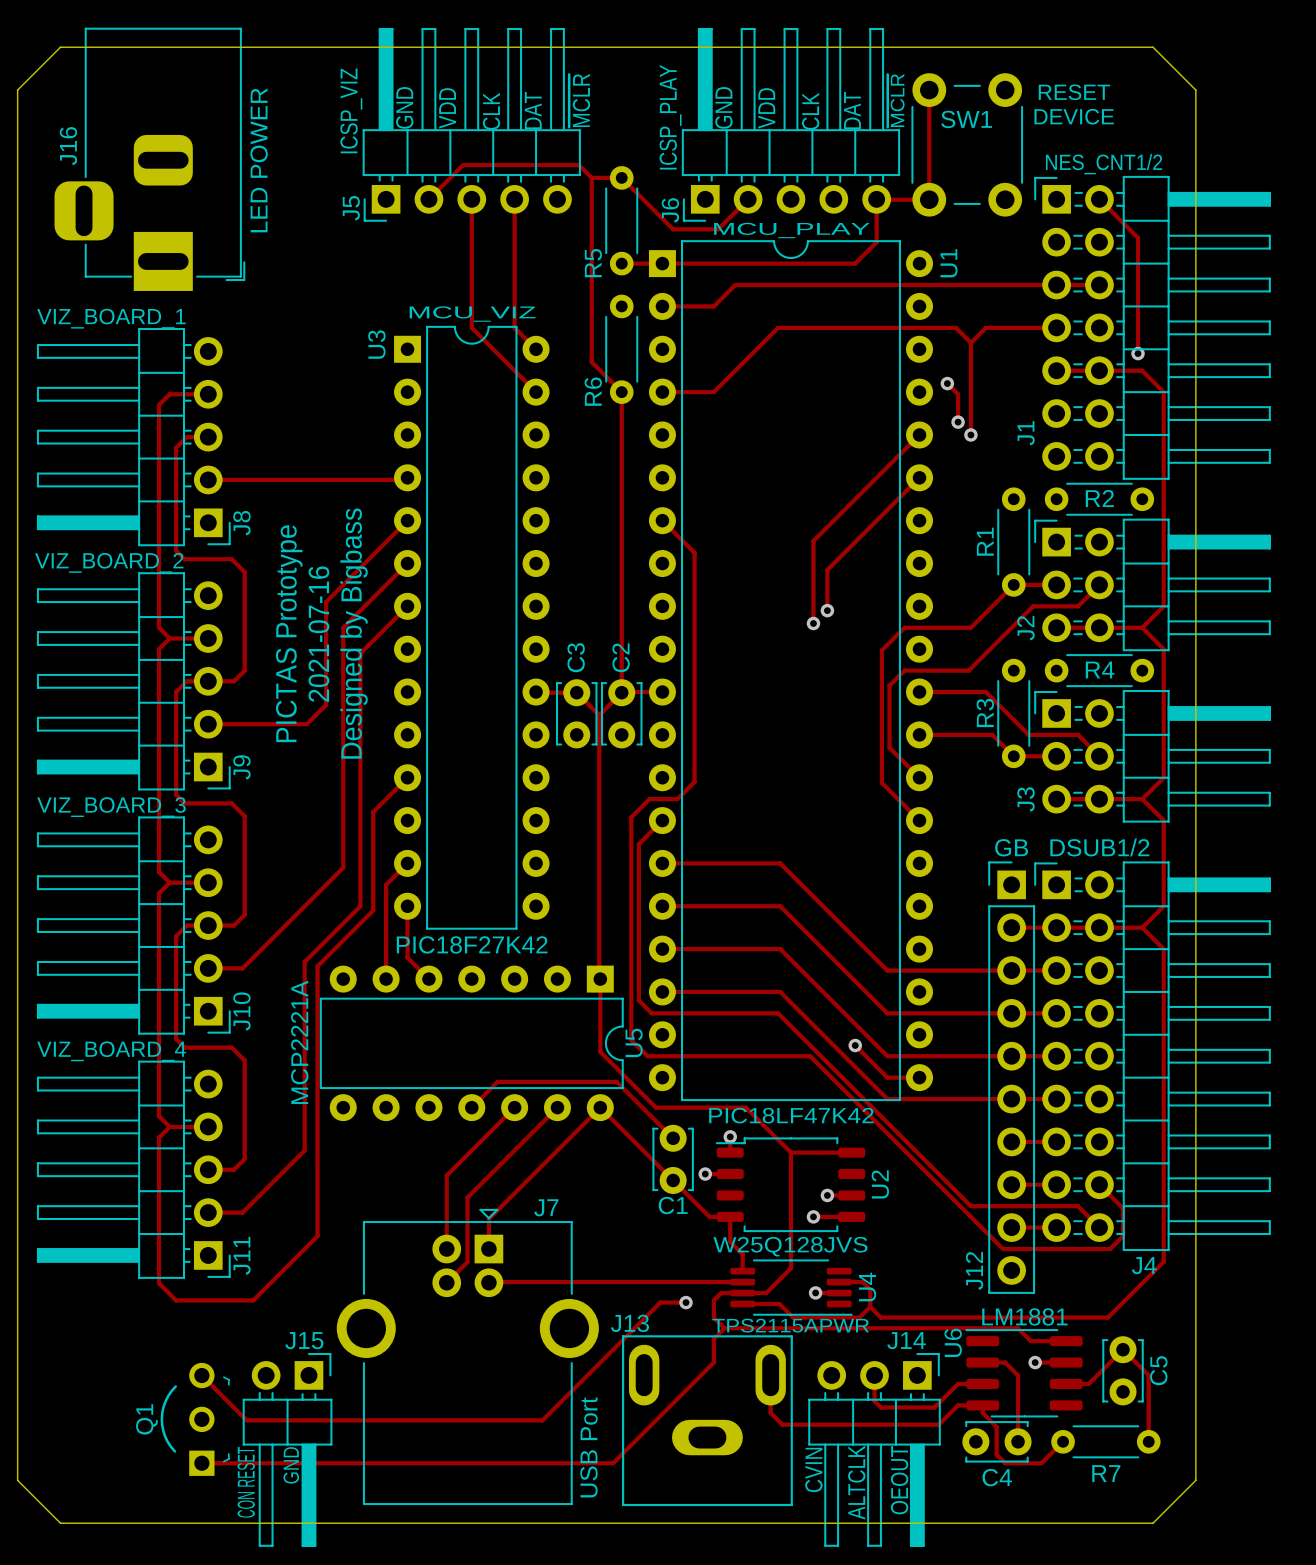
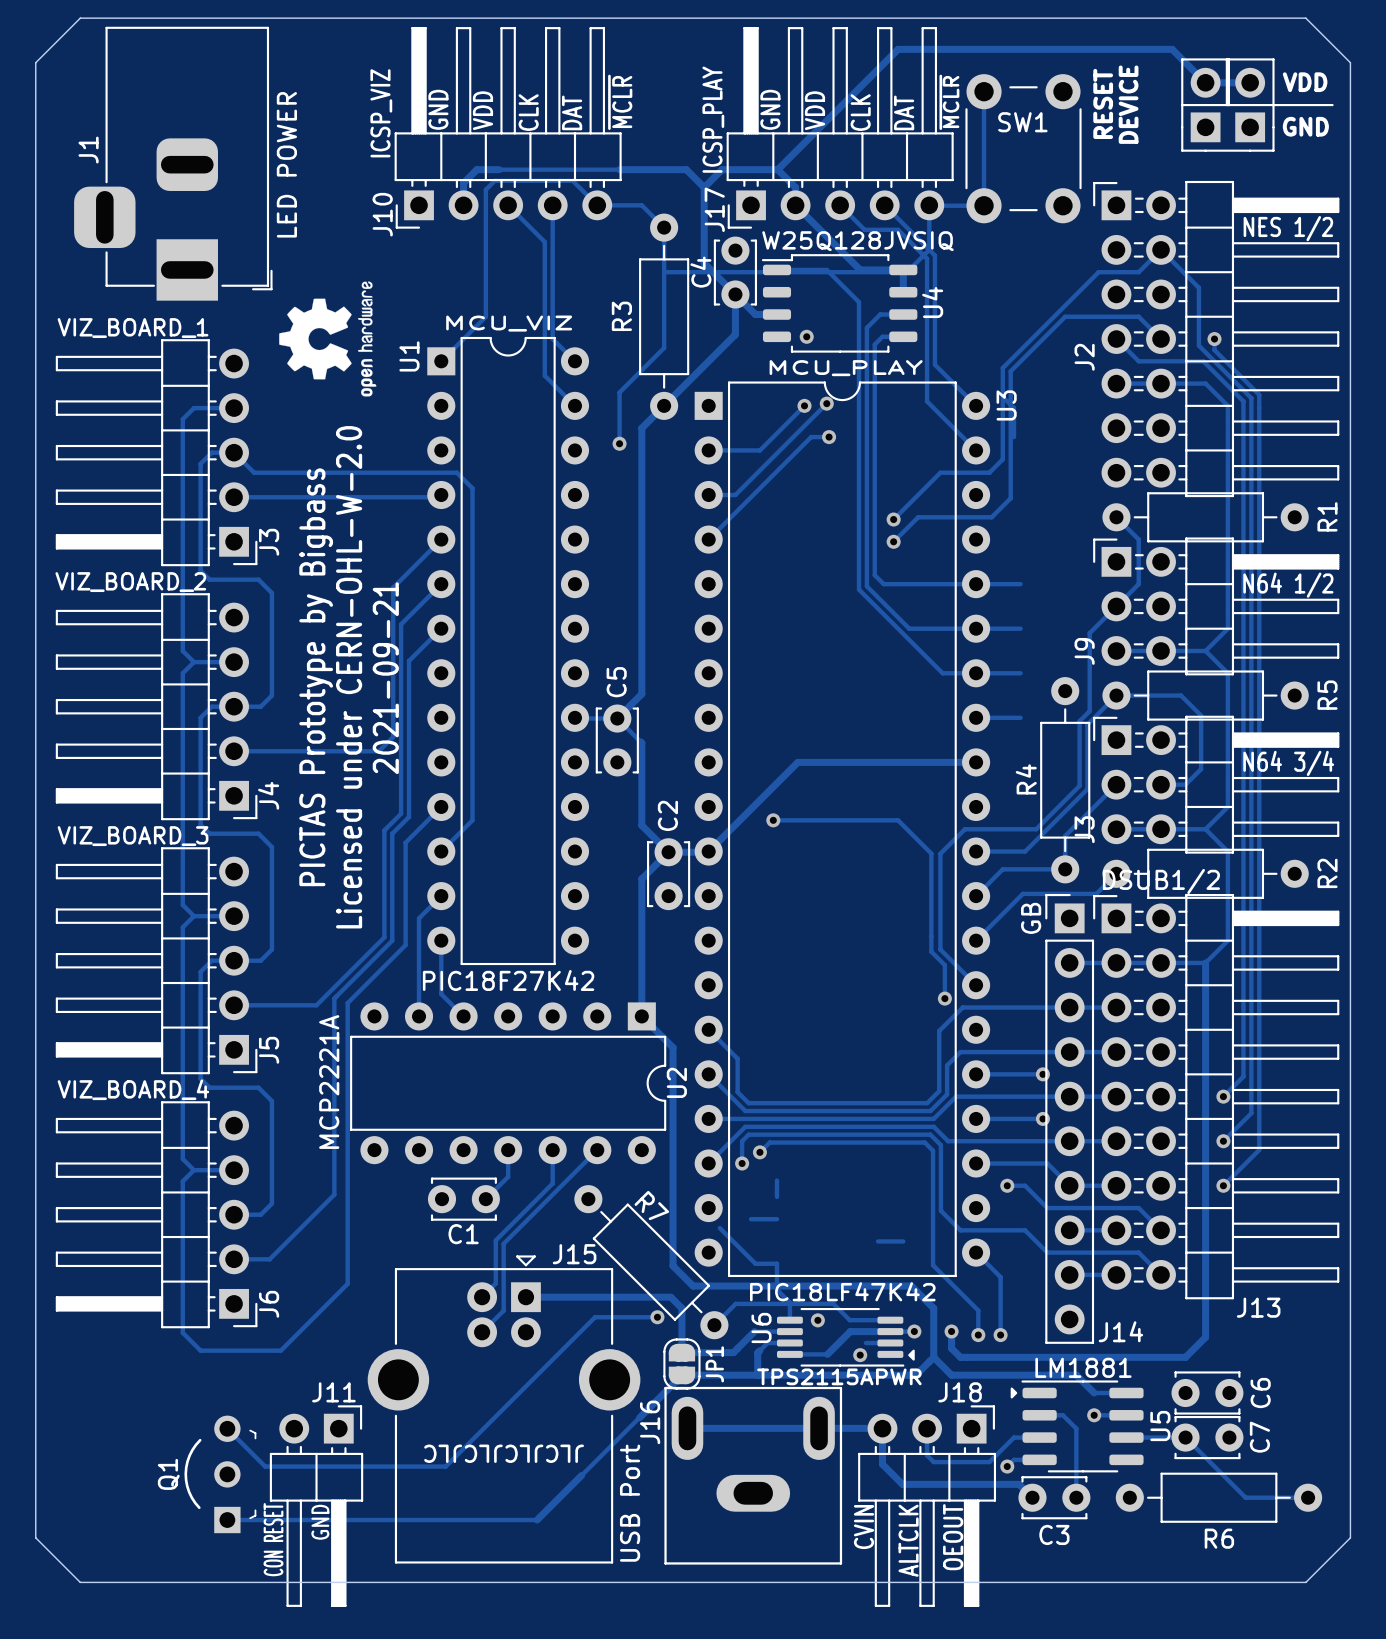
text: none -> VDD (1305, 82)
track: none -> (1250, 82) (1205, 82) (1172, 49) (898, 49) (777, 169)
board edge: (17, 90) (60, 47) (1153, 47) (1195, 90) (1195, 1480) (1153, 1523) -> (35, 91) (35, 62) (80, 18) (1305, 18) (1350, 62) (1350, 1537) (1305, 1582) (1216, 1582)
text rotation: 0° (1074, 92) -> 90° counterclockwise (1103, 103)
line: none -> (1182, 105) (1182, 127)
part: none -> (1205, 105)
part: none -> (1250, 105)
line: none -> (1332, 105) (1273, 105) (1273, 127)
text rotation: 0° (1074, 116) -> 90° counterclockwise (1128, 104)
text: none -> GND (1305, 126)
J16 name: J16 (68, 146) -> J1 (88, 150)
line: none -> (1205, 150) (1250, 150)
J1 value: NES_CNT1/2 (1104, 164) -> NES 1/2 (1288, 228)
track: (463, 165) (428, 199) -> (499, 169) (476, 169) (463, 183) (463, 205)
track: (578, 165) (591, 177) -> (619, 169) (686, 169) (704, 187)
track: none -> (777, 169) (795, 187) (795, 205) (860, 269) (903, 269) (903, 292)
track: none -> (777, 169) (722, 169) (704, 187)
R5 footprint: [605, 166, 639, 276] -> [1102, 670, 1309, 721]
track: (591, 177) (591, 362) (621, 392) (621, 692) -> none
track: (591, 177) (621, 177) (673, 229) (718, 229) (748, 199) -> none
track: none -> (704, 187) (704, 263) (755, 314) (776, 314)
track: (471, 199) (471, 327) (507, 363) -> (508, 205) (544, 242) (544, 375)
track: none -> (840, 205) (864, 229) (898, 229) (927, 258) (927, 401) (976, 450)
track: none -> (884, 205) (934, 255) (934, 364) (976, 405)
track: (1099, 199) (1138, 237) (1138, 353) -> none
J5 name: J5 (351, 208) -> J10 (382, 214)
J6 name: J6 (670, 210) -> J17 (714, 209)
text position: MCU_PLAY (791, 230) -> MCU_PLAY (846, 368)
track: none -> (776, 269) (826, 269) (859, 302) (859, 589) (942, 673) (1020, 673)
R5 name position: R5 (593, 263) -> R5 (1327, 695)
C4: none -> (735, 272)
drawing: none -> [279, 281, 377, 397]
track: none -> (735, 294) (735, 334) (641, 428) (641, 694) (617, 718)
track: (1099, 285) (735, 285) (713, 306) (662, 306) -> none
U4: none -> W25Q128JVSIQ (839, 303)
R6 footprint: [605, 294, 639, 404] -> [1115, 1472, 1323, 1523]
track: none -> (903, 314) (880, 314) (866, 327) (866, 586) (909, 628) (1020, 628)
via: none -> (806, 336)
track: none -> (903, 336) (882, 336) (874, 344) (874, 575) (883, 584) (1020, 584)
track: (985, 327) (1056, 327) -> (1042, 339) (1065, 316) (1138, 316) (1161, 339)
track: none -> (1116, 339) (1138, 361) (1203, 361) (1243, 401) (1243, 1076) (1223, 1096)
track: none -> (1214, 339) (1214, 350) (1259, 394) (1259, 1149) (1223, 1185)
track: none -> (1027, 354) (1010, 371) (1010, 498) (991, 517) (918, 517) (893, 541)
U3 name: U3 (376, 344) -> U1 (409, 356)
track: none -> (441, 361) (485, 316) (485, 189) (494, 180) (572, 180) (597, 205) (641, 205) (664, 227) (664, 347) (619, 392) (619, 443)
via position: (1138, 353) -> (1214, 339)
via: (947, 383) -> none
track: none -> (826, 403) (735, 495) (708, 495)
via: none -> (826, 403)
track: (662, 392) (713, 392) (778, 327) (955, 327) (970, 342) (970, 434) -> none
track: none -> (804, 405) (759, 450) (708, 450)
via: none -> (804, 405)
track: none -> (829, 437) (811, 437) (708, 539)
via: none -> (829, 437)
via: (958, 422) -> none
via: none -> (619, 443)
J1 name: J1 (1026, 433) -> J2 (1084, 357)
track: (919, 434) (813, 541) (813, 623) -> none
via: (970, 434) -> none
track: none -> (234, 452) (254, 472) (456, 472) (472, 488) (472, 820) (441, 851)
track: (919, 477) (827, 569) (827, 610) -> none
R2 footprint: [1044, 482, 1155, 516] -> [1102, 848, 1309, 899]
R1 footprint: [997, 487, 1031, 597] -> [1102, 492, 1309, 543]
R2 name position: R2 (1099, 498) -> R2 (1327, 873)
track: none -> (1116, 517) (1138, 539) (1138, 584) (1089, 633) (1089, 711) (1079, 721) (1079, 785) (1036, 829) (964, 829) (940, 853) (940, 949) (976, 985)
track: none -> (893, 519) (940, 472) (989, 472) (1002, 459) (1002, 368) (1098, 272) (1138, 272) (1161, 249) (1198, 287) (1198, 345) (1251, 398) (1251, 1113) (1223, 1141)
via: none -> (893, 519)
track: (662, 520) (694, 552) (694, 782) (677, 799) (649, 799) (631, 817) (631, 1040) (647, 1056) (810, 1056) (1003, 1249) (1110, 1249) (1123, 1236) (1123, 1208) (1099, 1184) -> (1007, 1185) (1025, 1185) (1047, 1208) (1138, 1208) (1161, 1230)
via: none -> (893, 541)
J8 name: J8 (241, 523) -> J3 (269, 542)
R1 name position: R1 (985, 541) -> R1 (1327, 516)
J2 value: none -> N64 1/2 (1288, 585)
track: (361, 566) (326, 602) (326, 704) (306, 724) -> (393, 587) (393, 736) (378, 751) (336, 751)
track: (1056, 584) (1013, 584) (970, 627) (904, 627) (881, 650) (881, 782) (919, 820) -> none
track: (1099, 584) (1078, 606) (1033, 606) (968, 670) (904, 670) (889, 685) (889, 747) (919, 777) -> none
track: (368, 602) (343, 627) (343, 867) (242, 968) -> (401, 624) (401, 813) (384, 830) (384, 937) (316, 1005) (269, 1005)
via: (827, 610) -> none
via: (813, 623) -> none
J2 name: J2 (1025, 628) -> J9 (1084, 651)
text: PICTAS Prototype (289, 633) -> PICTAS Prototype by Bigbass (316, 677)
text: Designed by Bigbass (354, 633) -> none
text: 2021-07-16 (318, 634) -> 2021-09-21 (385, 678)
track: (376, 637) (360, 653) (360, 803) -> (408, 661) (408, 816) (392, 833)
text: none -> Licensed under CERN-OHL-W-2.0 (349, 677)
R4 footprint: [1044, 654, 1155, 688] -> [1040, 677, 1091, 884]
C3 name: C3 (576, 657) -> C5 (616, 682)
R3 footprint: [997, 658, 1031, 769] -> [639, 213, 690, 420]
R4 name position: R4 (1100, 669) -> R4 (1026, 779)
U1: PIC18LF47K42 (790, 670) -> none
track: (662, 692) (622, 692) (599, 715) (600, 1051) (656, 1107) (745, 1107) (790, 1152) -> none
track: (964, 692) (985, 692) (1028, 734) (1078, 734) (1099, 756) -> (976, 851) (1025, 851) (1087, 789) (1087, 724) (1116, 695) (1181, 695) (1201, 715) (1201, 769) (1185, 784) (1161, 784)
C2 position: (621, 713) -> (668, 874)
track: none -> (640, 741) (641, 825) (668, 852)
J3 value: none -> N64 3/4 (1288, 763)
track: none -> (973, 762) (797, 762) (707, 852) (668, 852)
track: (921, 734) (992, 734) (1013, 756) (1056, 756) -> (976, 896) (1002, 869) (1065, 869) (1065, 835) (1116, 784)
J9 name: J9 (241, 767) -> J4 (268, 795)
track: none -> (773, 820) (898, 820) (931, 853) (931, 951) (944, 965) (944, 998)
via: none -> (773, 820)
U3: none -> PIC18LF47K42 (842, 829)
track: (662, 820) (638, 844) (638, 1000) (651, 1013) (778, 1013) (970, 1206) (990, 1206) -> (742, 1163) (742, 1141) (748, 1134) (930, 1134) (940, 1145) (940, 1210) (960, 1230) (1025, 1230) (1047, 1252)
track: none -> (668, 852) (641, 878) (641, 1016) (673, 1047) (673, 1265) (693, 1286) (911, 1286) (933, 1308) (933, 1357)
track: none -> (1116, 873) (1096, 893) (1022, 893) (976, 940)
J12 value rotation: 0° (1011, 847) -> 90° counterclockwise (1031, 918)
J12 value position: GB (1011, 847) -> GB (1031, 918)
track: (662, 863) (780, 863) (887, 970) (908, 970) -> (708, 1029) (737, 1058) (737, 1092) (748, 1103) (927, 1103) (939, 1091) (939, 1031) (962, 1007)
track: (662, 906) (780, 906) (887, 1013) (906, 1013) -> (708, 1074) (745, 1111) (930, 1111) (947, 1094) (947, 1065) (960, 1052)
track: (1142, 927) (1163, 949) (1163, 1261) (1108, 1317) (880, 1317) (870, 1306) -> (1205, 962) (1205, 1337) (1185, 1357) (960, 1357) (951, 1348) (951, 1331)
track: (662, 949) (780, 949) (887, 1056) (902, 1056) -> (708, 1118) (933, 1118) (956, 1096)
via: none -> (944, 998)
track: (662, 991) (780, 991) (887, 1099) (894, 1099) -> (708, 1163) (745, 1126) (933, 1126) (948, 1141)
J10 name: J10 (241, 1011) -> J5 (269, 1050)
track: none -> (976, 1074) (1042, 1074)
via: none -> (1042, 1074)
U5 name: U5 (634, 1042) -> U2 (676, 1082)
track: (855, 1045) (887, 1077) (919, 1077) -> none
via: (855, 1045) -> none
via: none -> (1223, 1096)
track: none -> (976, 1118) (1042, 1118)
via: none -> (1042, 1118)
via: none -> (1223, 1141)
track: (471, 1107) (497, 1081) (616, 1081) (673, 1138) -> (508, 1150) (508, 1176) (485, 1199)
track: (514, 1107) (446, 1175) (446, 1249) -> (552, 1150) (552, 1183) (495, 1240) (495, 1283) (482, 1297)
track: none -> (759, 1152) (769, 1142) (924, 1142) (933, 1150) (933, 1265) (978, 1310) (978, 1335)
via: none -> (759, 1152)
via: none -> (742, 1163)
track: none -> (976, 1163) (1047, 1163) (1069, 1185)
via: (730, 1136) -> none
via: none -> (1007, 1185)
via: none -> (1223, 1185)
track: (790, 1152) (851, 1152) -> none
track: (790, 1152) (790, 1268) (766, 1293) (742, 1293) -> none
C1 rotation: 0° (673, 1159) -> 90° clockwise (463, 1199)
C1 position: (673, 1159) -> (463, 1199)
via: (705, 1174) -> none
track: (673, 1180) (600, 1107) (488, 1219) (488, 1249) -> none
U2: W25Q128JVS (790, 1184) -> none
via: (827, 1195) -> none
track: none -> (976, 1252) (1000, 1277) (1000, 1335)
J7 name: J7 (546, 1207) -> J15 (574, 1254)
track: (813, 1216) (851, 1216) -> none
via: (813, 1216) -> none
J11 name: J11 (242, 1255) -> J6 (269, 1304)
J4 name: J4 (1144, 1265) -> J13 (1258, 1307)
via: none -> (657, 1317)
J12 name: J12 (974, 1270) -> J14 (1120, 1331)
via: none -> (817, 1320)
track: none -> (890, 1320) (849, 1320) (833, 1303) (735, 1303) (714, 1325)
track: (708, 1282) (488, 1282) -> (754, 1331) (733, 1352) (681, 1352) (681, 1308) (670, 1297) (525, 1297)
track: (862, 1282) (870, 1289) (870, 1306) -> none
via: none -> (914, 1331)
via: none -> (951, 1331)
via: none -> (978, 1335)
via: none -> (1000, 1335)
U4 name: U4 (867, 1286) -> U6 (761, 1327)
via position: (815, 1292) -> (860, 1355)
drawing: none -> [908, 1349, 915, 1361]
track: (713, 1300) (713, 1317) (724, 1328) -> (759, 1350) (757, 1352) (757, 1375)
track: (686, 1302) (660, 1302) (597, 1364) -> (933, 1357) (915, 1375) (682, 1375) (639, 1417)
via: (686, 1302) -> none
track: (778, 1304) (793, 1317) (859, 1317) (870, 1306) -> (827, 1354) (850, 1331) (890, 1331)
JP1: none -> (681, 1364)
J13 name: J13 (629, 1323) -> J16 (650, 1422)
track: (724, 1328) (1018, 1328) (1030, 1341) (1035, 1341) -> (933, 1357) (951, 1375) (1076, 1375) (1094, 1393)
track: (724, 1328) (713, 1338) (713, 1362) (613, 1463) (499, 1463) -> (581, 1475) (537, 1520)
drawing: none -> [1010, 1387, 1018, 1399]
J15 name: J15 (304, 1340) -> J11 (333, 1392)
J14 name: J14 (906, 1340) -> J18 (960, 1392)
C6: none -> (1207, 1393)
U6 name: U6 (953, 1342) -> U5 (1160, 1426)
C5: (1123, 1370) -> none
track: none -> (687, 1428) (882, 1428) (882, 1464) (902, 1484) (1019, 1484) (1032, 1497)
track: (770, 1375) (770, 1412) (782, 1424) (938, 1424) (951, 1411) -> none
track: (1088, 1383) (1123, 1349) (1148, 1375) (1148, 1441) -> (1149, 1437) (1185, 1437) (1245, 1497) (1308, 1497)
C7: none -> (1207, 1437)
text: none -> JLCJLCJLCJLC (504, 1453)
track: (982, 1405) (982, 1412) (996, 1426) (996, 1454) (1005, 1463) (1041, 1463) (1063, 1441) -> none
track: (238, 1411) (246, 1420) (542, 1420) -> (265, 1466) (445, 1466) (595, 1317) (657, 1317)
via: none -> (1007, 1466)
R7 footprint: [1051, 1425, 1161, 1459] -> [574, 1185, 729, 1340]
R7 name position: R7 (1106, 1473) -> R7 (651, 1205)
C4 name: C4 (997, 1477) -> C3 (1054, 1534)

